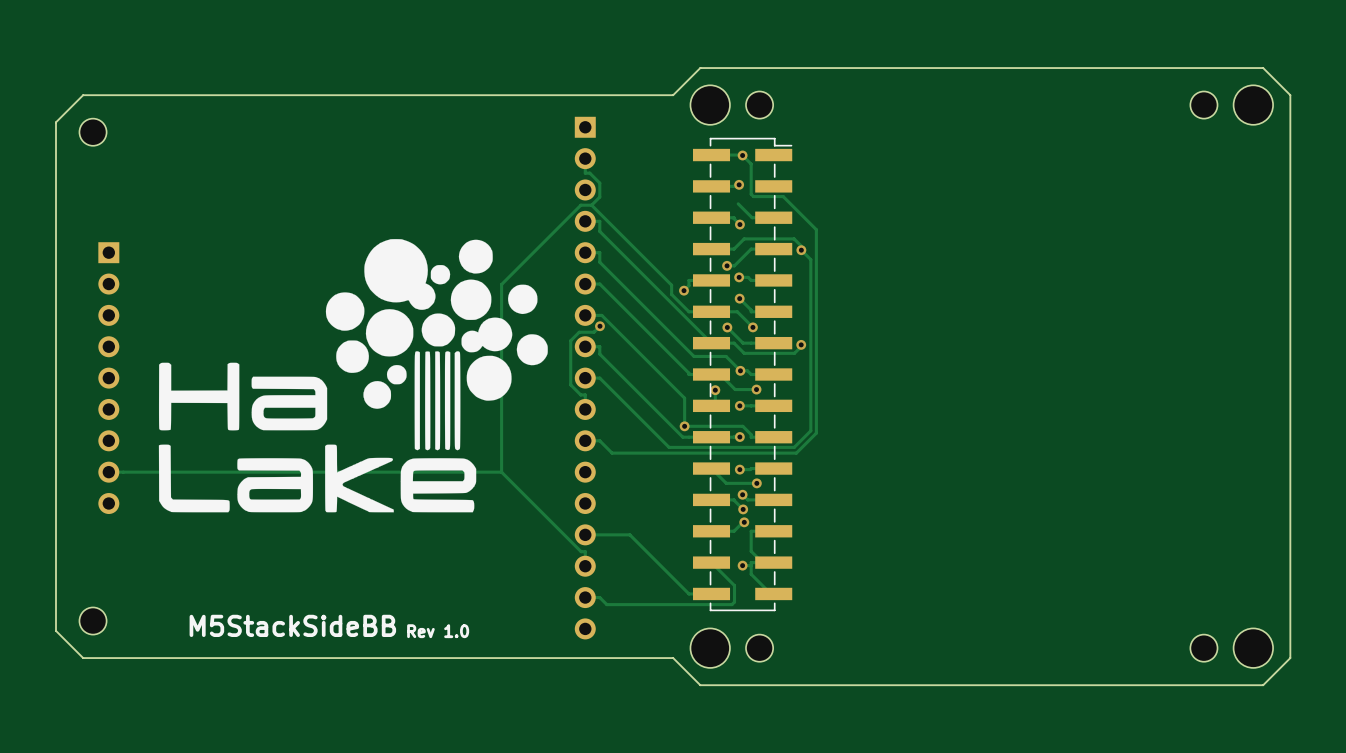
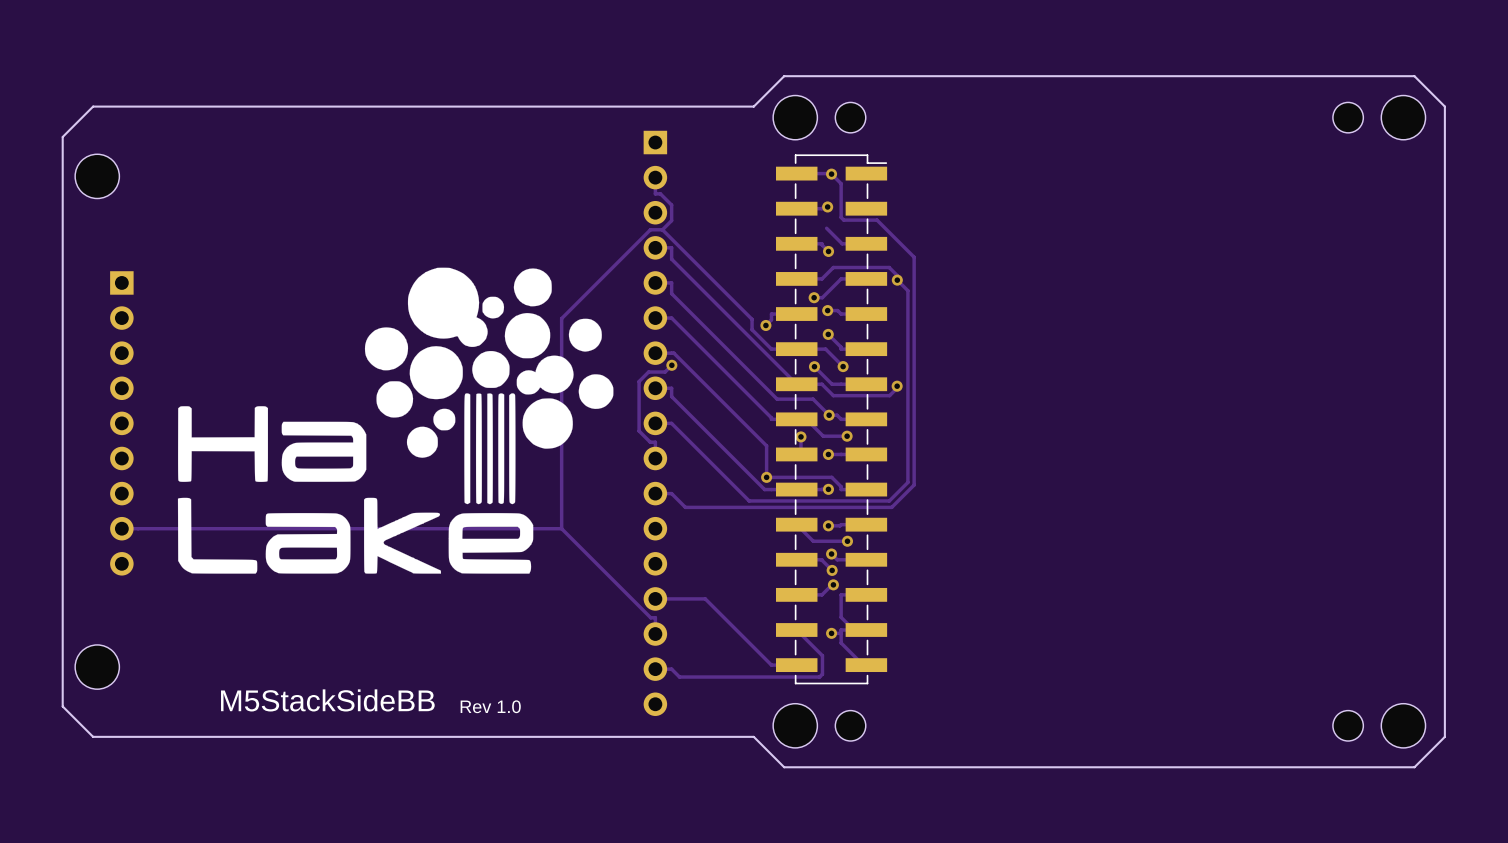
part: (93, 132) -> none
part: none -> (97, 176)
part: none -> (97, 667)
part: (93, 621) -> none

